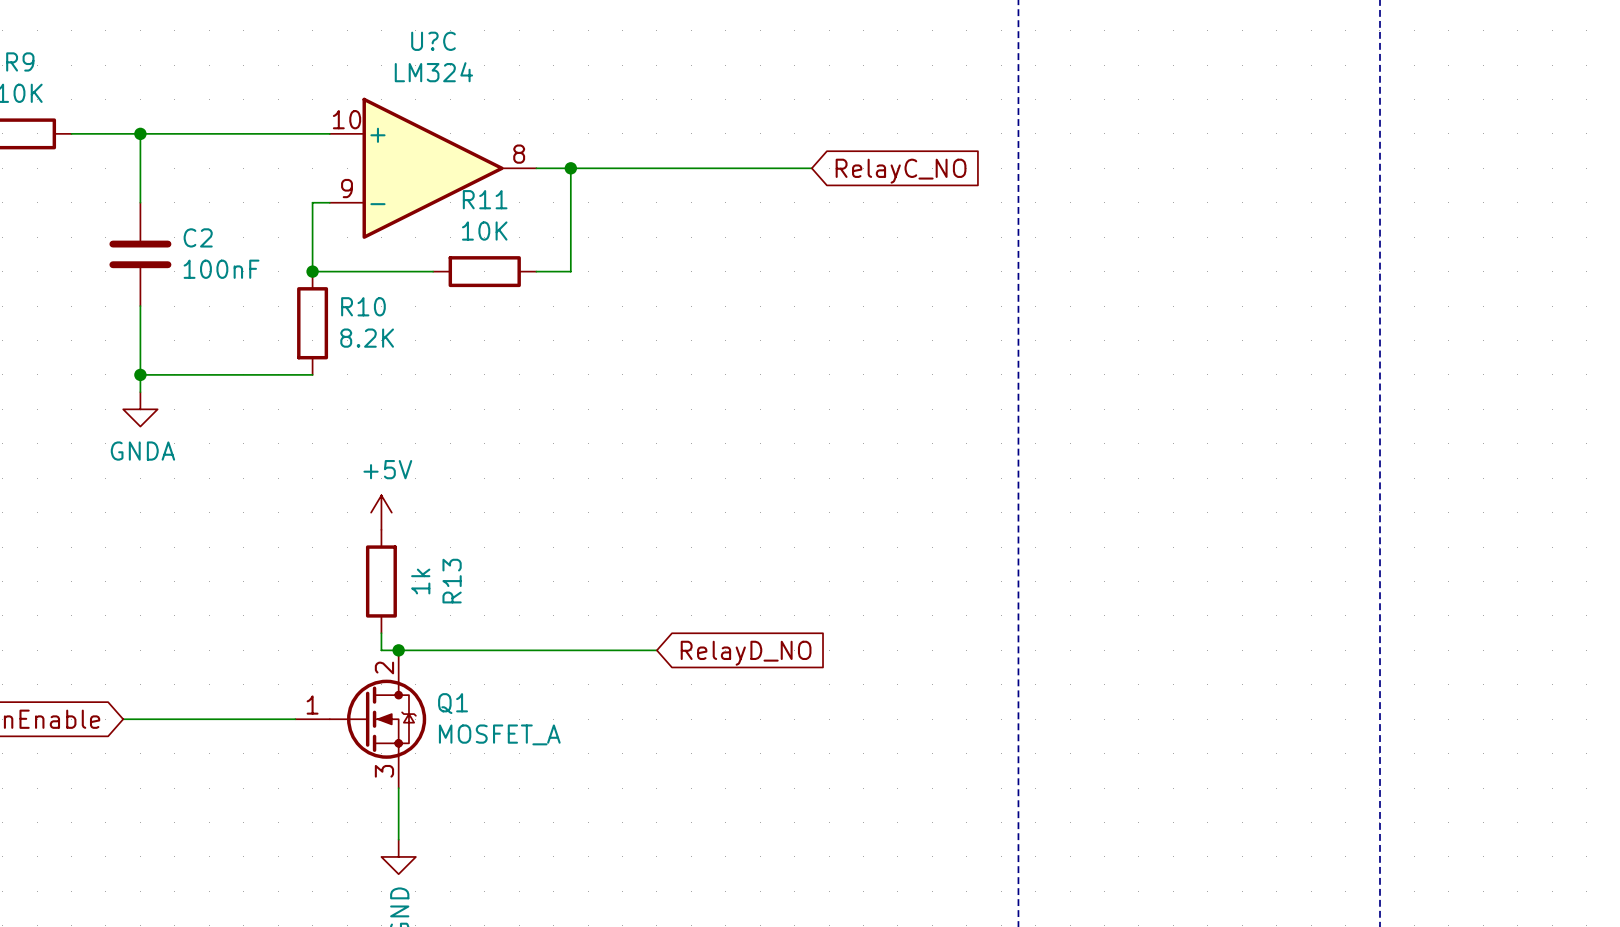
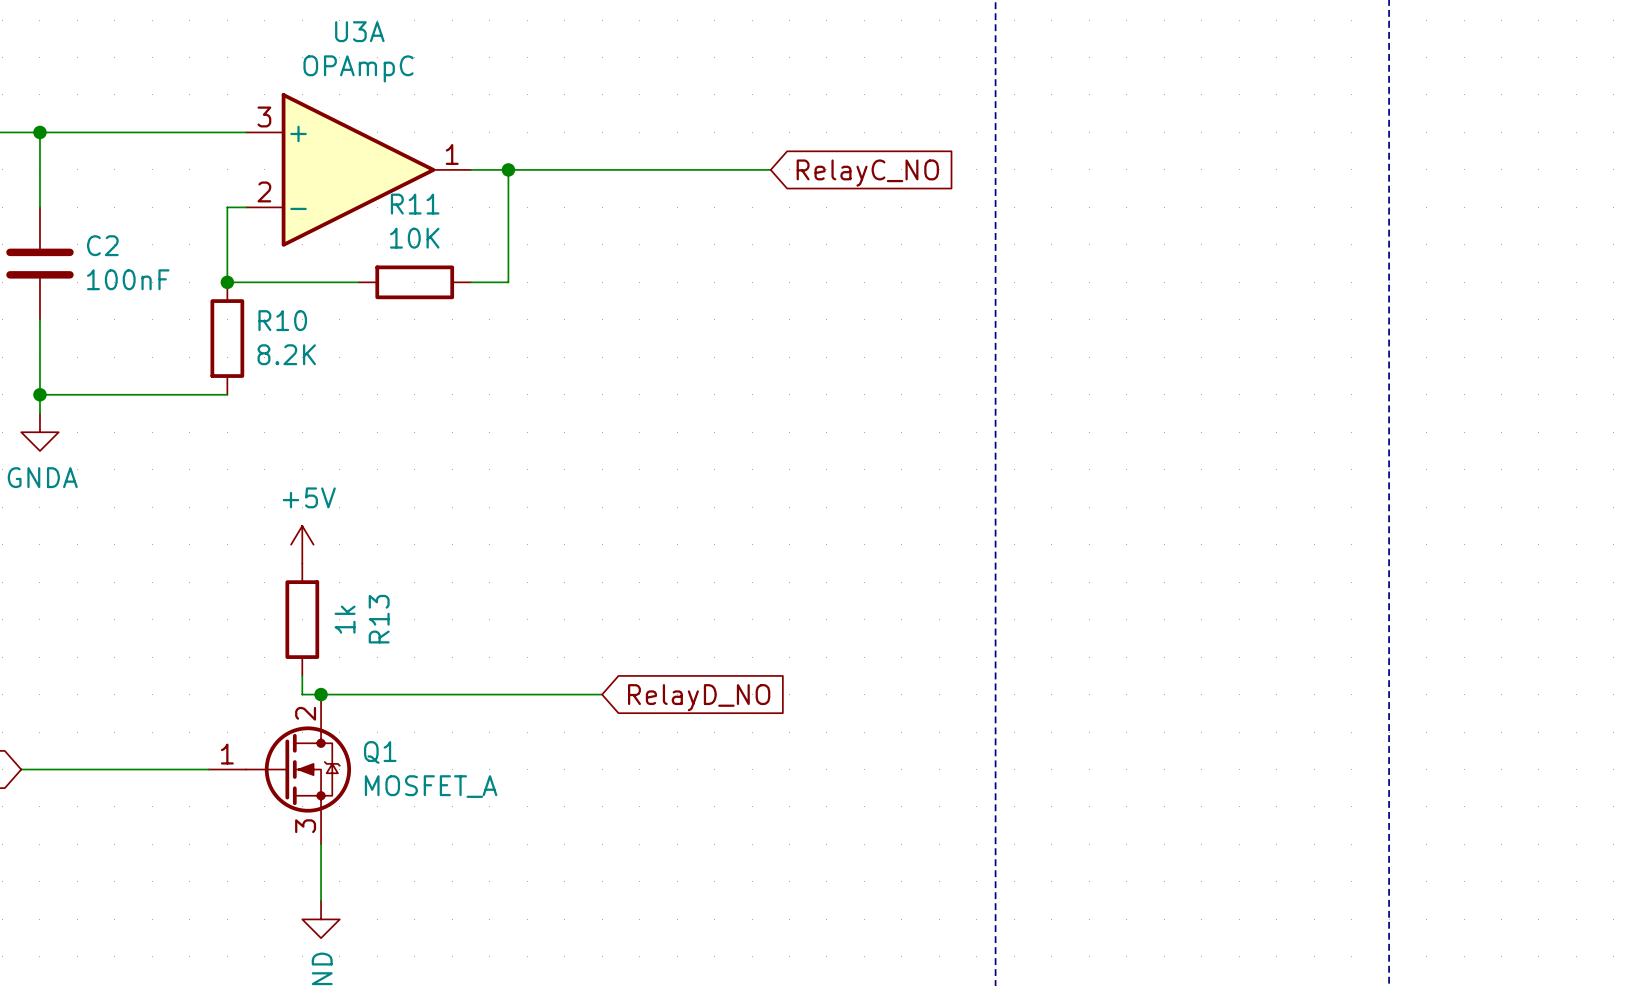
U?C name: U?C (433, 41) -> U3A (359, 31)
U?C value: LM324 (433, 72) -> OPAmpC (358, 68)
U?C pin number: 10 (347, 119) -> 3 (264, 116)
U?C pin number: 8 (519, 154) -> 1 (452, 154)
U?C pin number: 9 (347, 188) -> 2 (264, 191)

